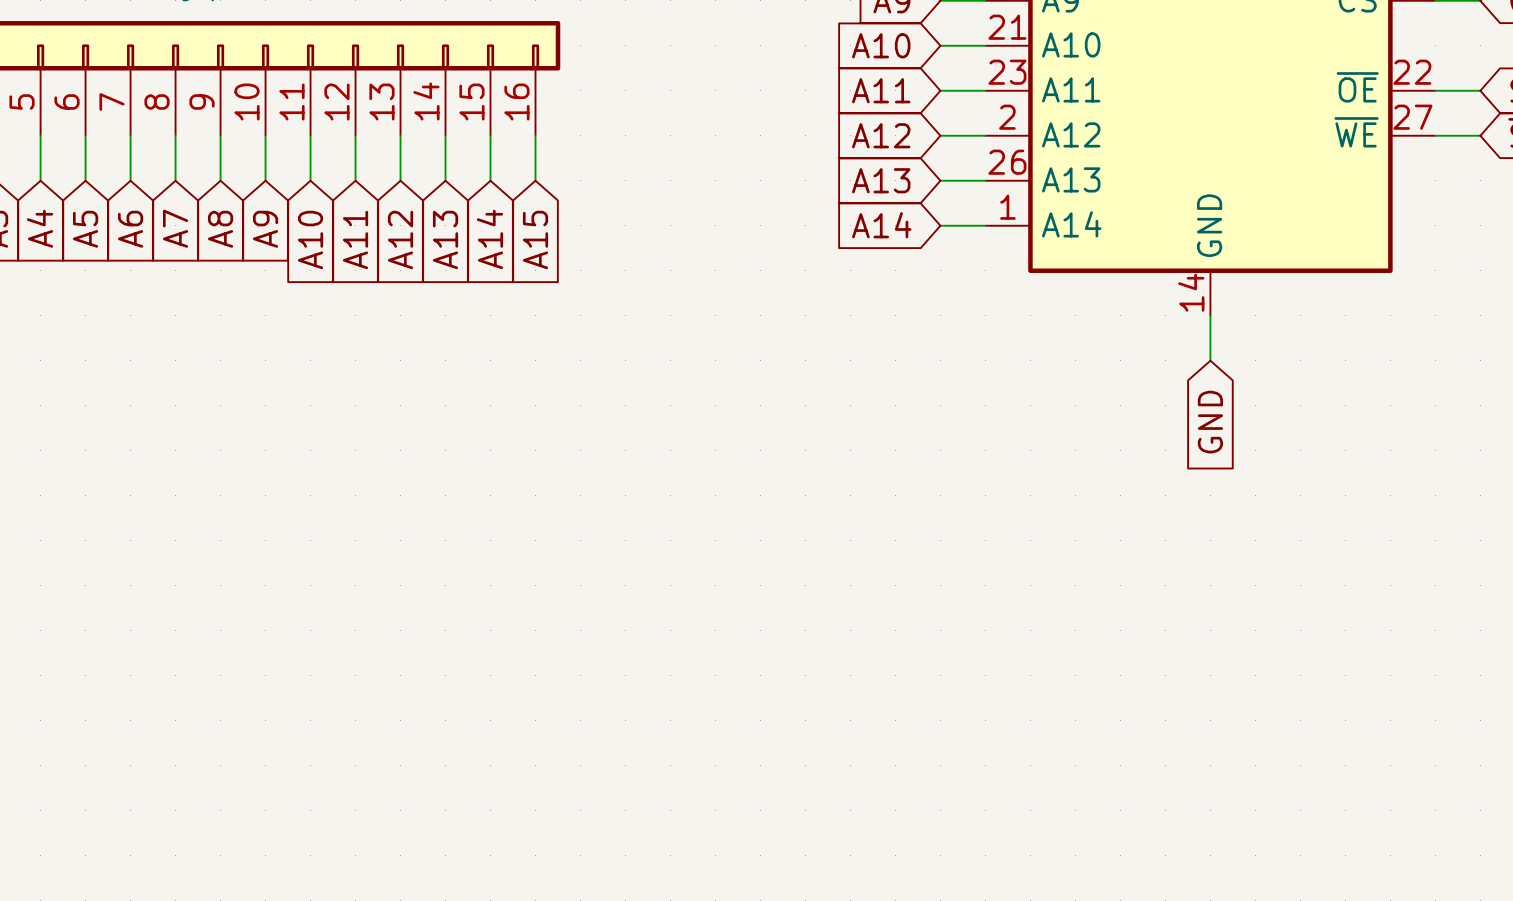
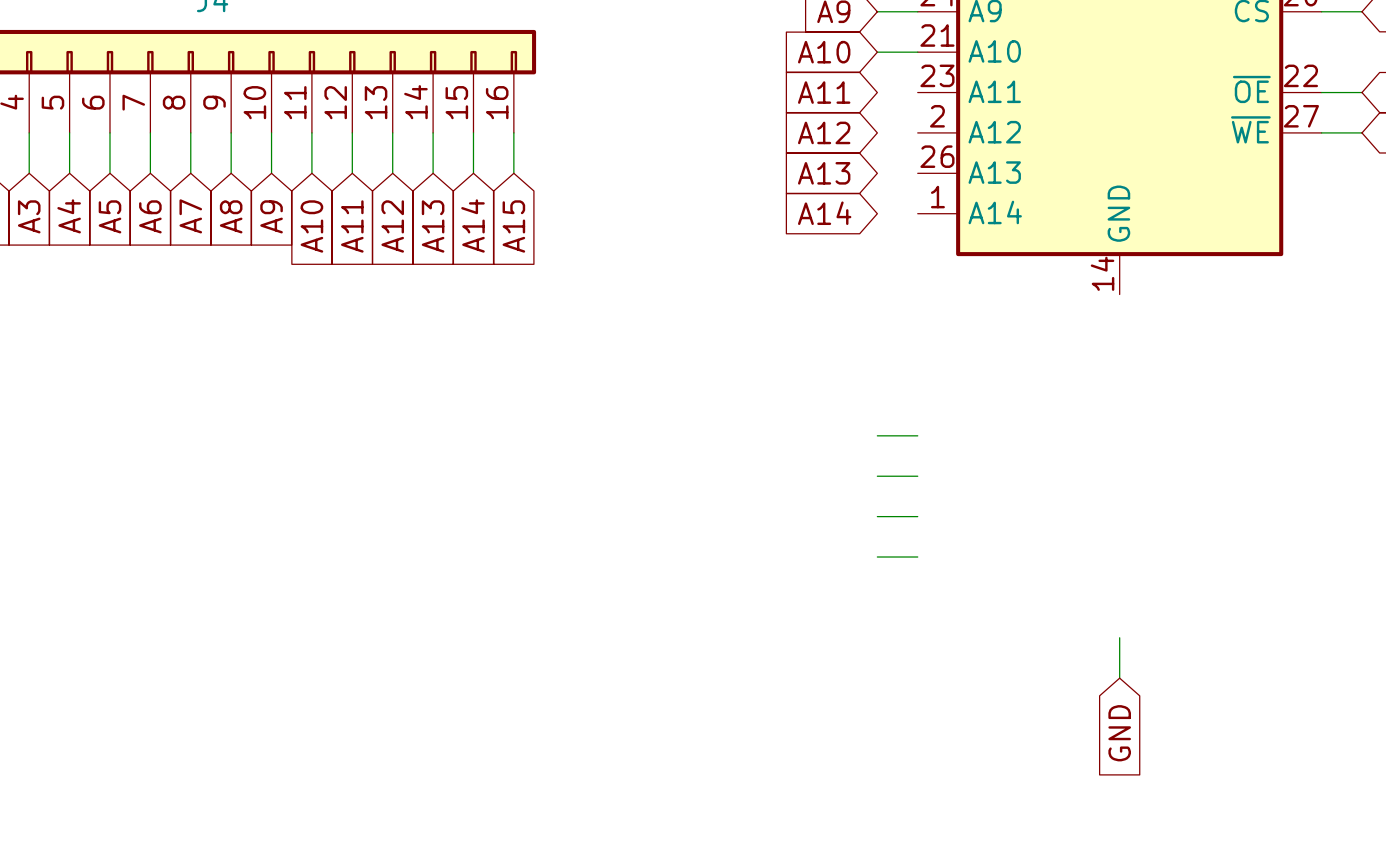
wire: (940, 90) (985, 90) -> (877, 435) (917, 435)
wire: (940, 135) (985, 135) -> (877, 476) (917, 476)
wire: (940, 180) (985, 180) -> (877, 516) (917, 516)
wire: (940, 225) (985, 225) -> (877, 557) (917, 557)
wire: (1210, 315) (1210, 360) -> (1119, 637) (1119, 678)
global label position: GND (1210, 422) -> GND (1119, 733)

